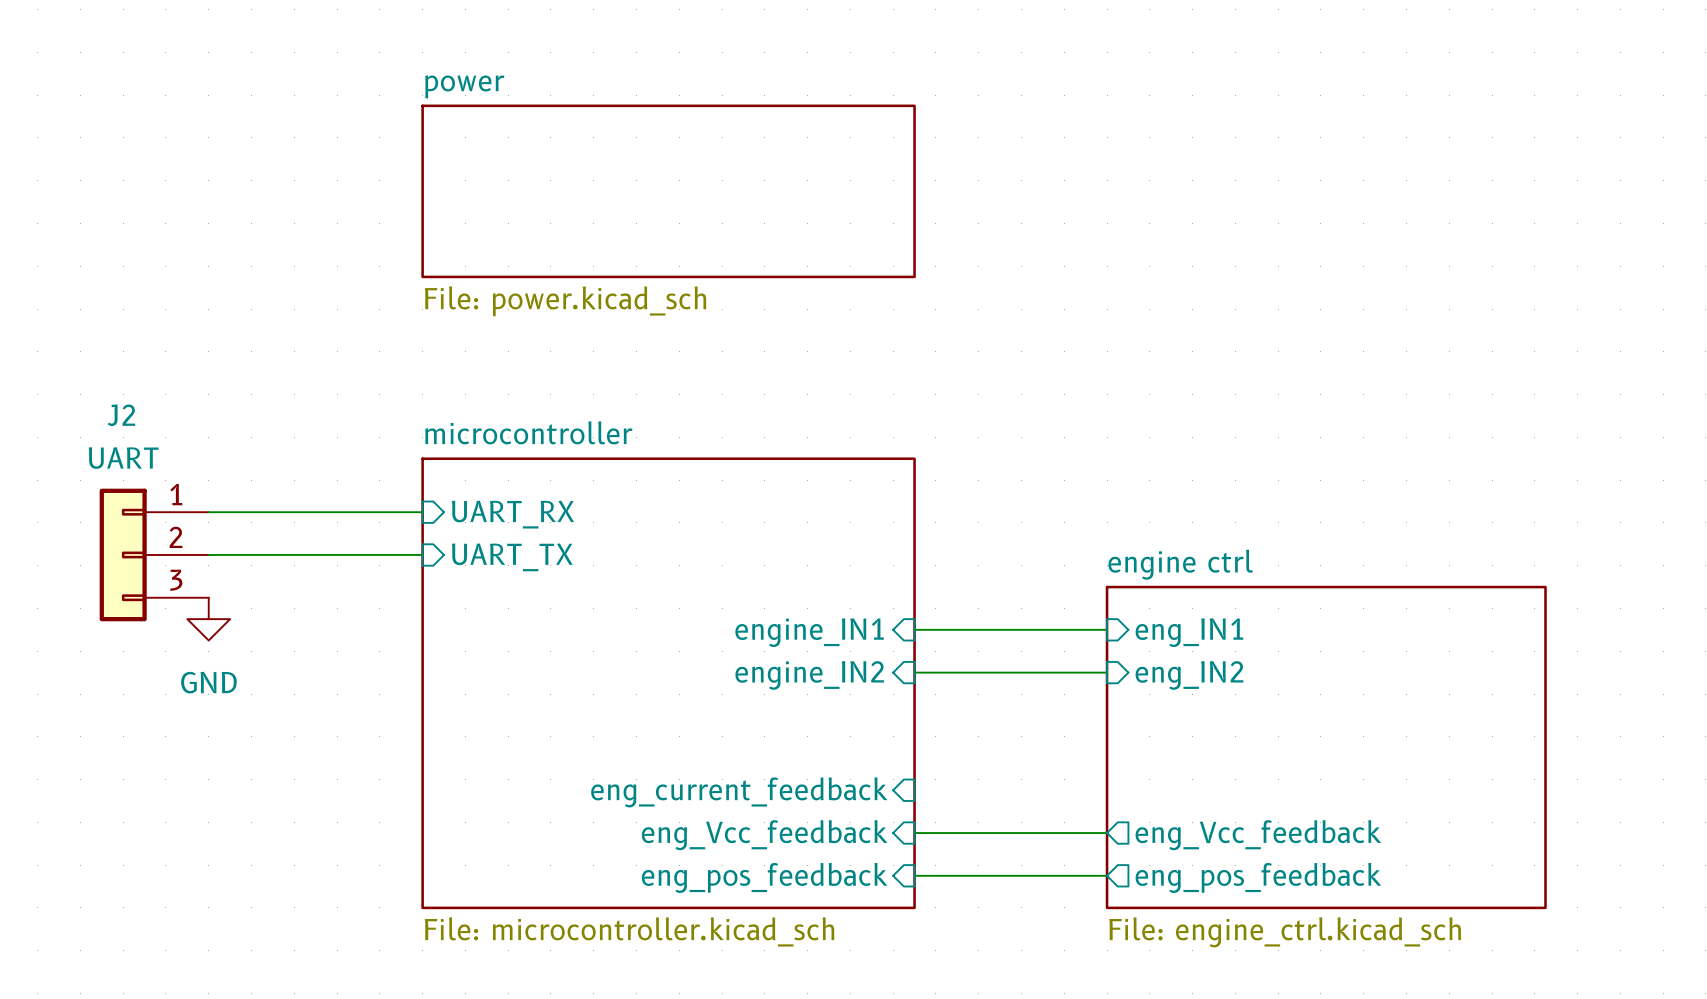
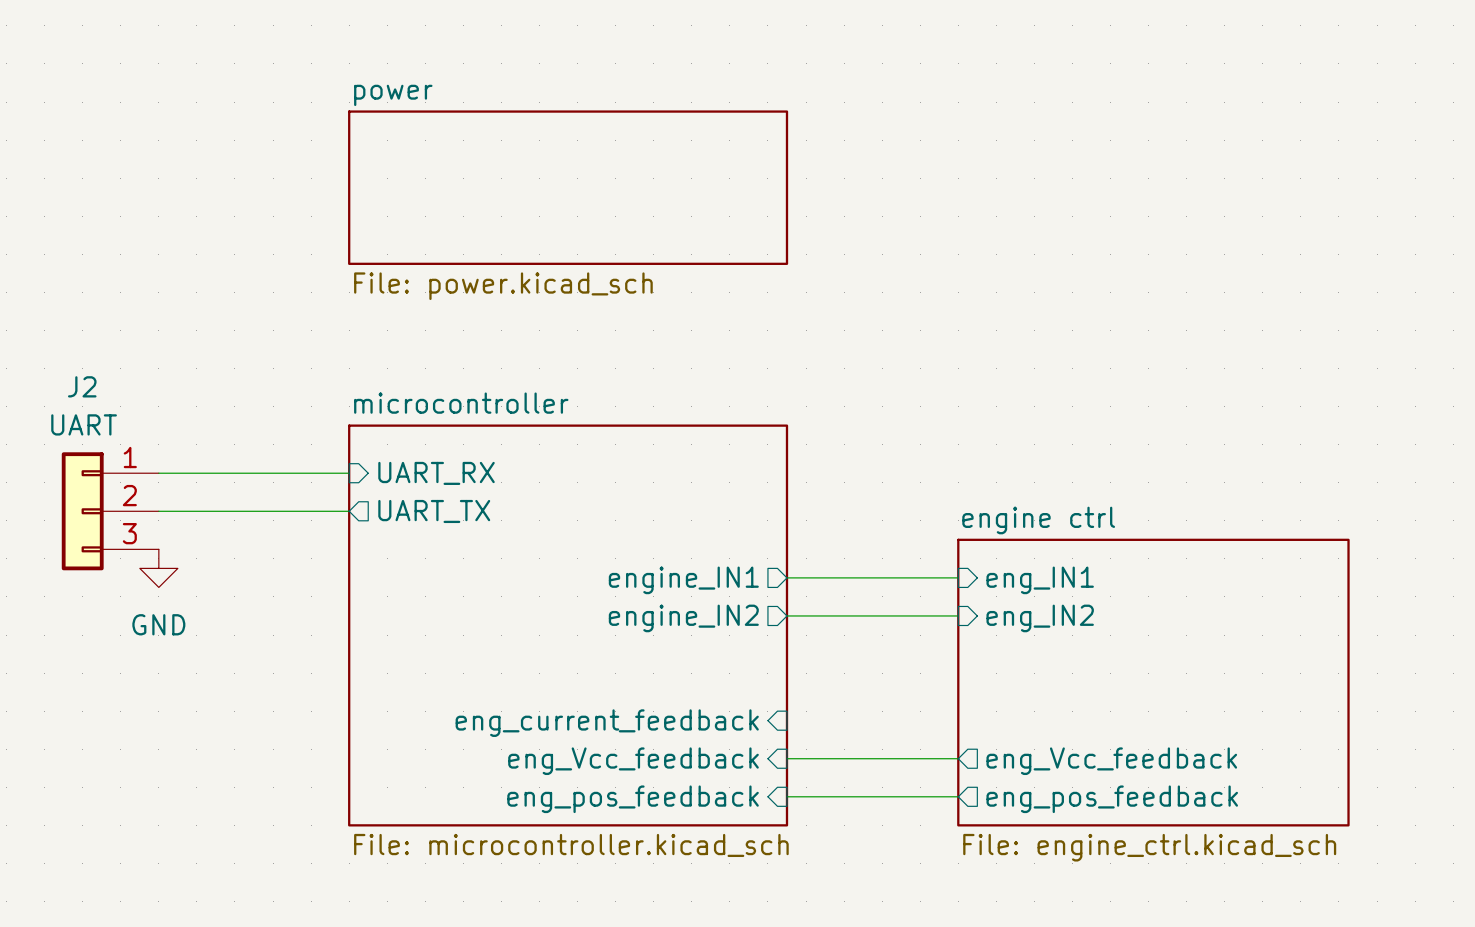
sheet pin shape: input (512, 557) -> output (434, 511)
sheet pin shape: input (809, 632) -> output (683, 580)
sheet pin shape: input (809, 675) -> output (683, 618)

